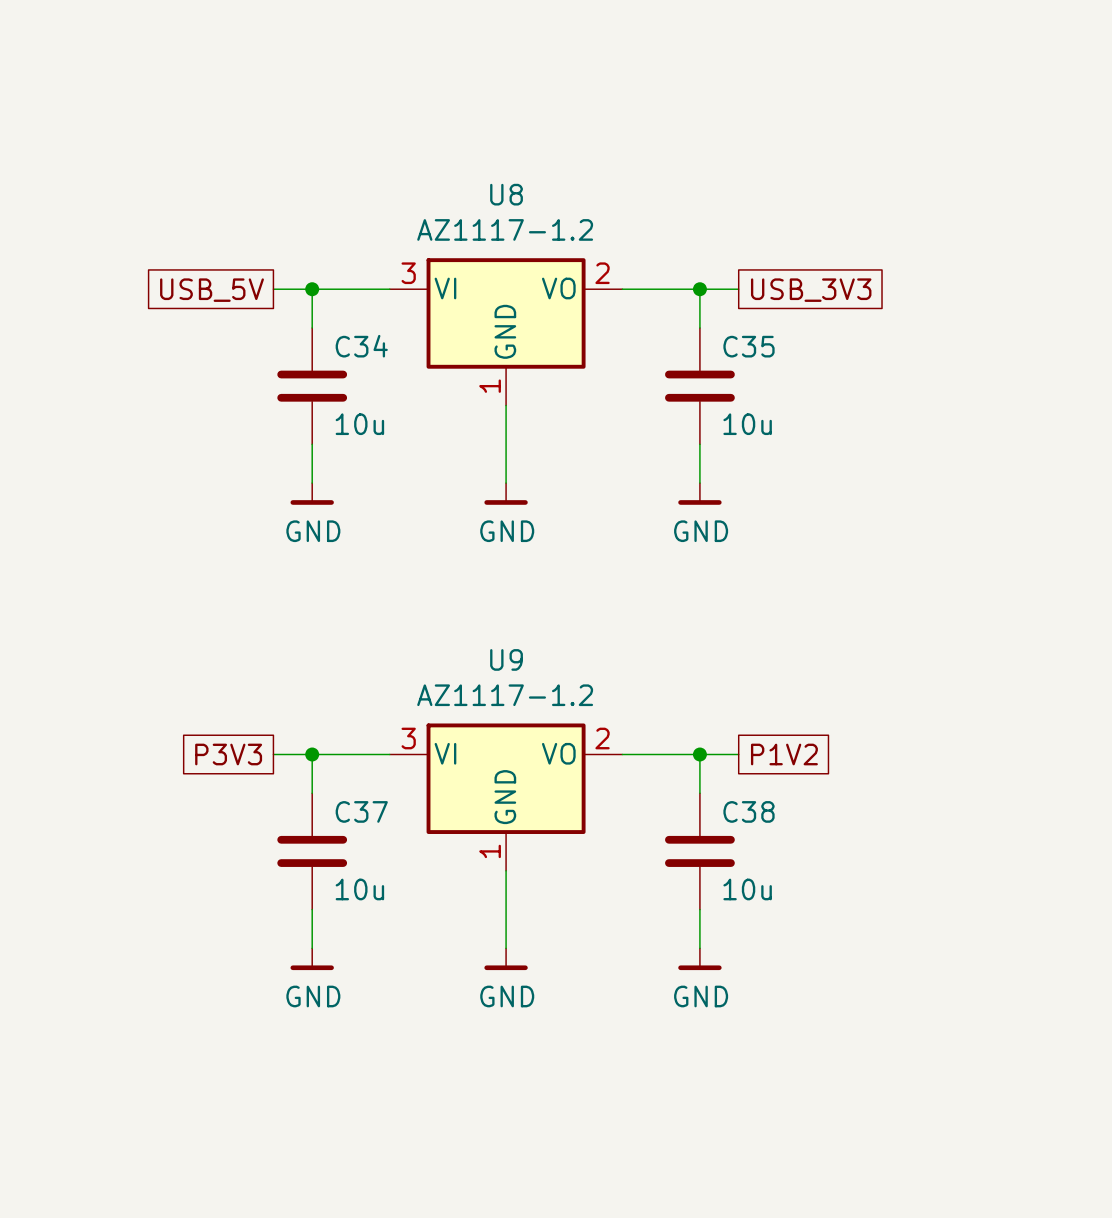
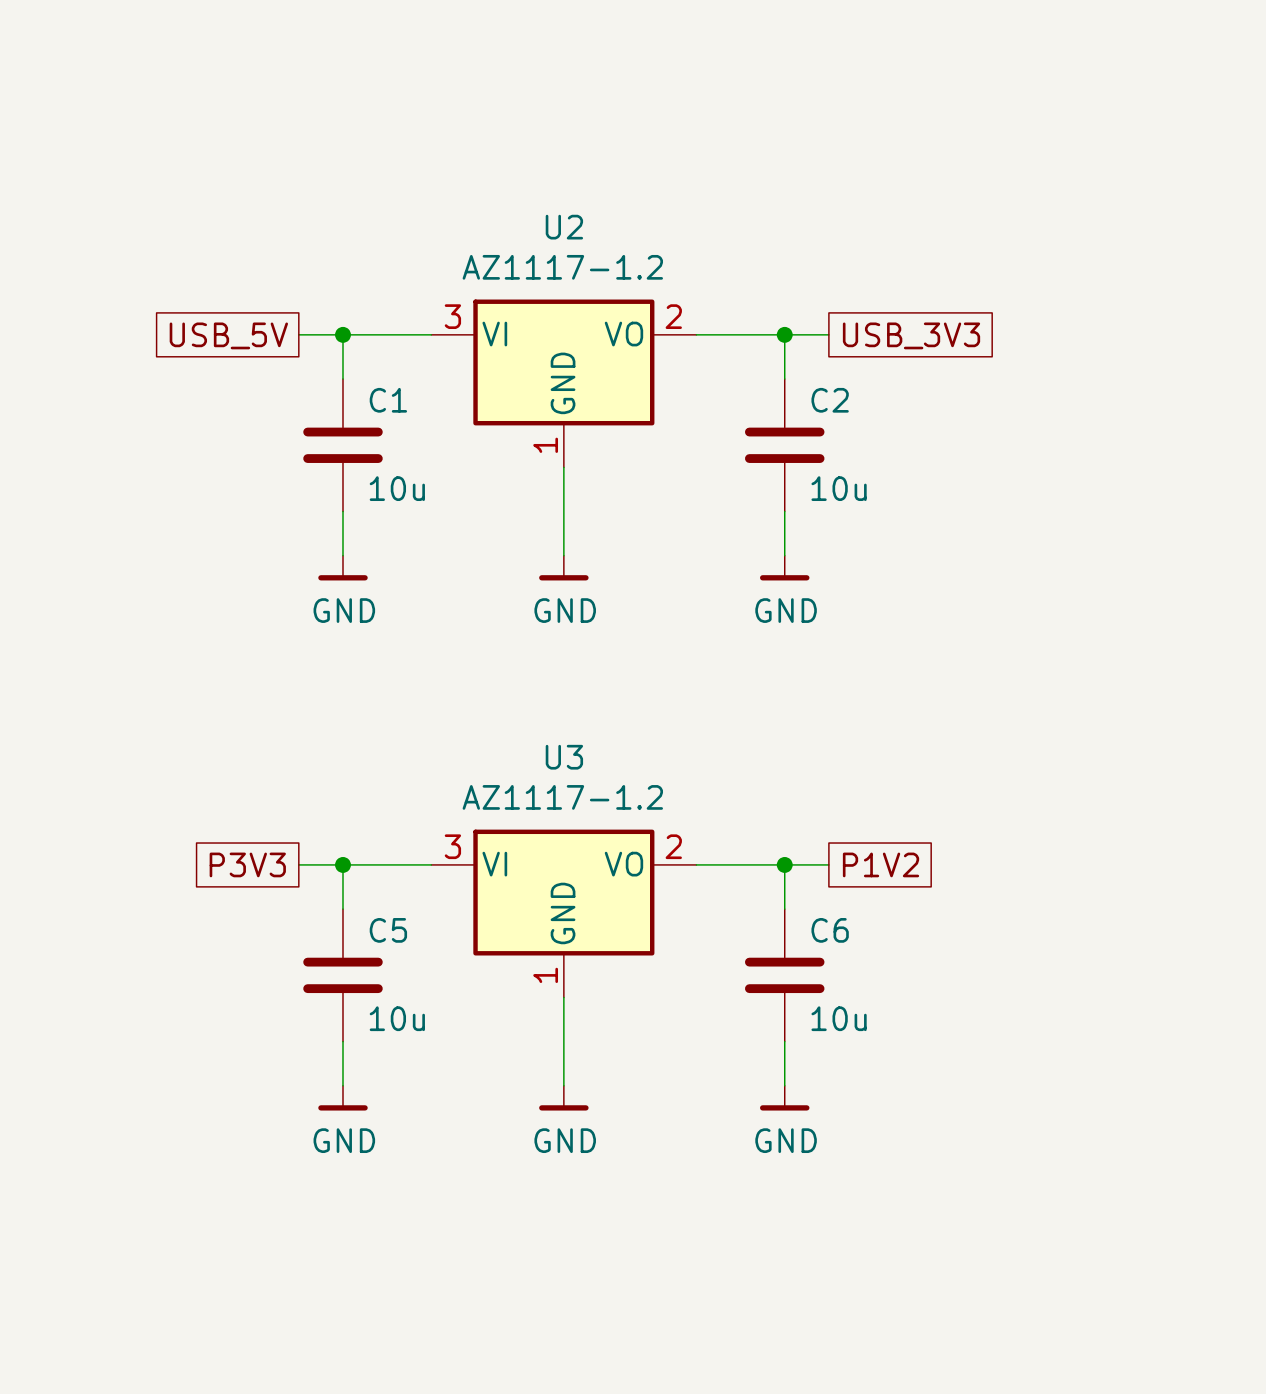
U8 name: U8 (506, 194) -> U2 (564, 227)
C34 name: C34 (361, 346) -> C1 (388, 400)
C35 name: C35 (749, 346) -> C2 (830, 400)
U9 name: U9 (506, 659) -> U3 (564, 757)
C37 name: C37 (361, 811) -> C5 (388, 930)
C38 name: C38 (749, 811) -> C6 (830, 930)

